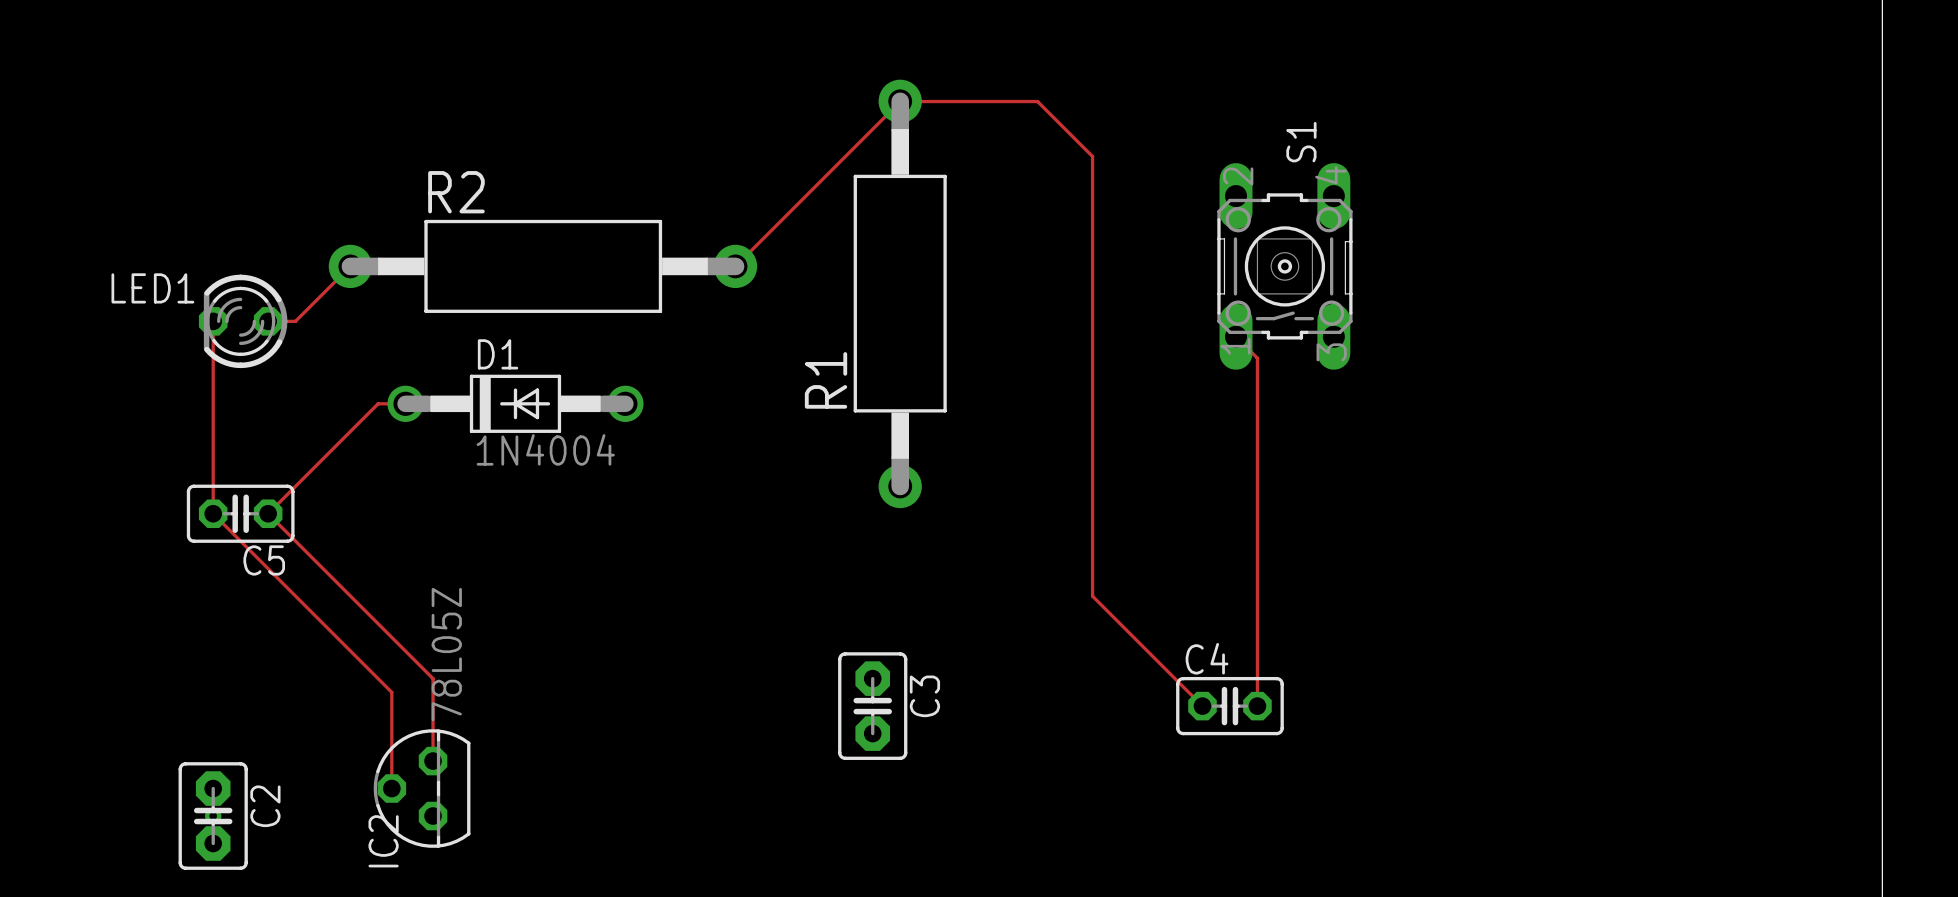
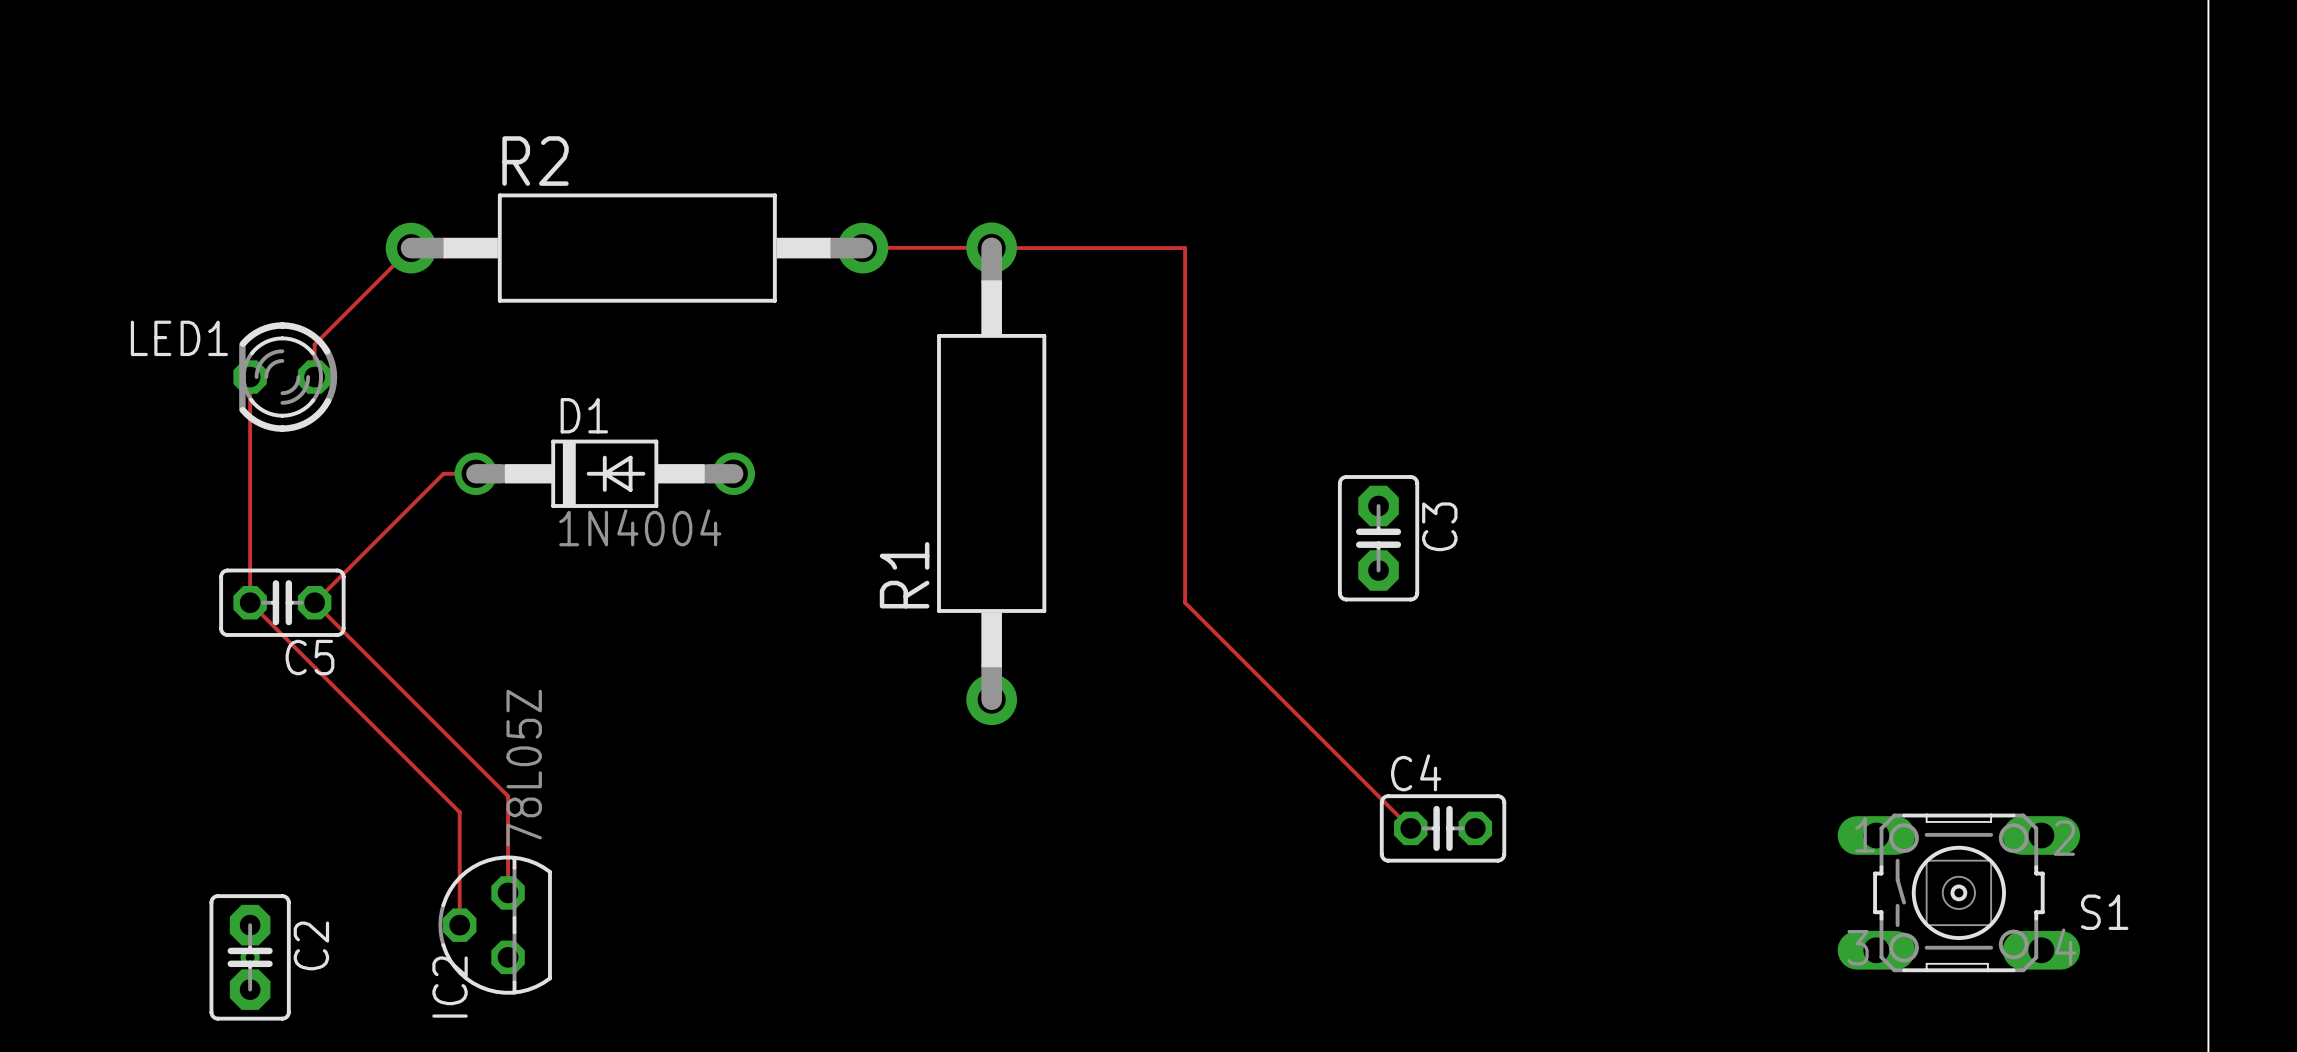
track: (900, 101) (1037, 101) (1092, 156) (1092, 596) -> (991, 248) (1185, 248) (1185, 602) (1281, 699)
track: (900, 101) (735, 266) -> none
track: none -> (863, 247) (991, 247)
track: (350, 266) (295, 321) (268, 321) -> (411, 248) (314, 344) (314, 377)
R2 position: (542, 266) -> (637, 248)
S1 rotation: 0° (1284, 266) -> 90° clockwise (1958, 892)
S1 position: (1284, 266) -> (1958, 892)
R1 position: (900, 293) -> (991, 473)
track: (1236, 336) (1257, 358) (1257, 706) -> none
C3 position: (872, 706) -> (1378, 538)

